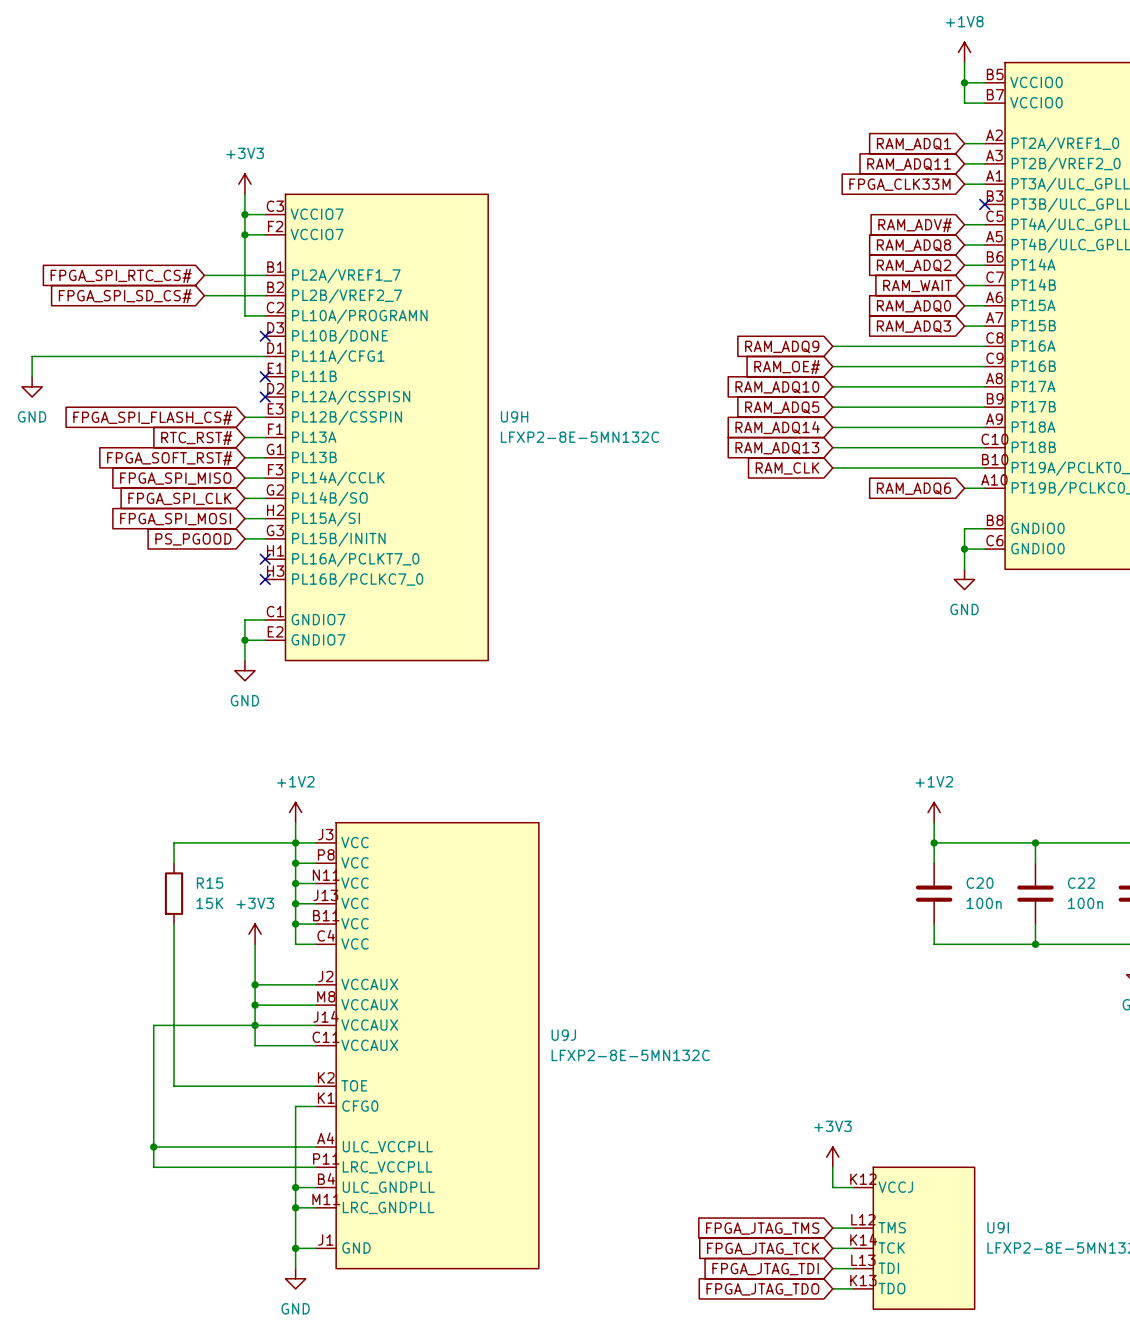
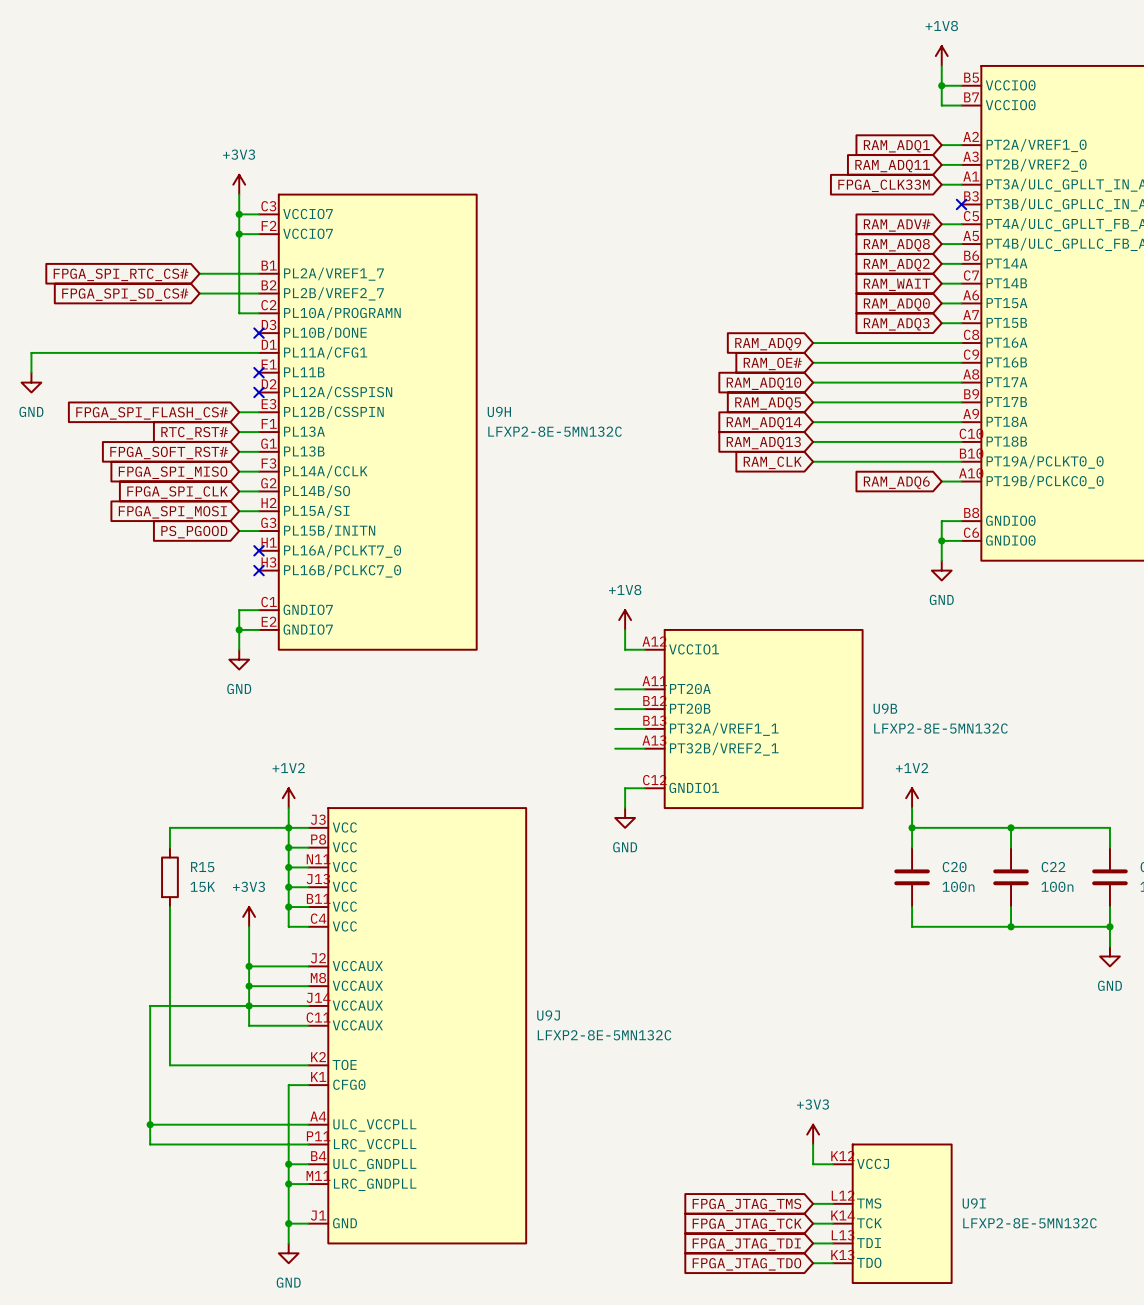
power symbol: none -> +1V8 (625, 620)
wire: none -> (625, 629) (625, 649) (644, 649)
wire: none -> (615, 689) (644, 689)
wire: none -> (615, 709) (644, 709)
U9B: none -> LFXP2-8E-5MN132C (753, 719)
wire: none -> (615, 728) (644, 728)
wire: none -> (615, 748) (644, 748)
wire: none -> (644, 788) (625, 788) (625, 808)
power symbol: none -> GND (625, 817)

